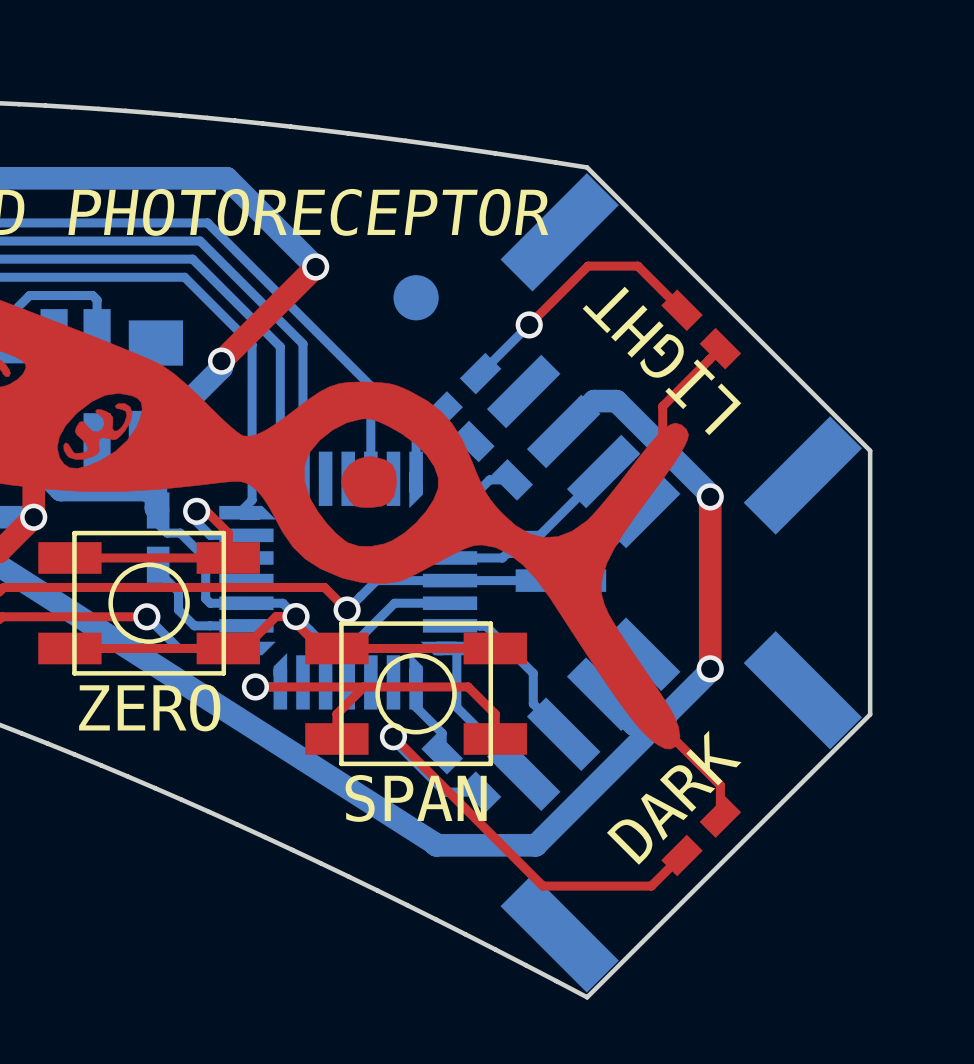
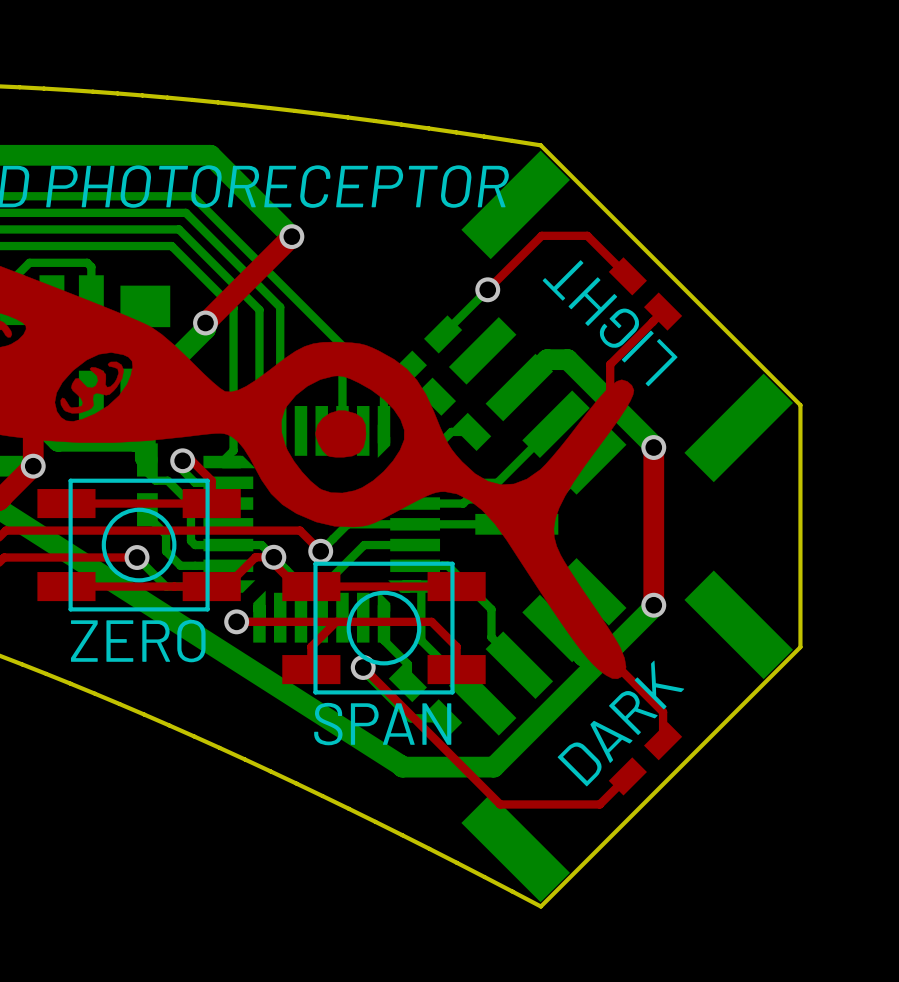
part: (416, 297) -> none

